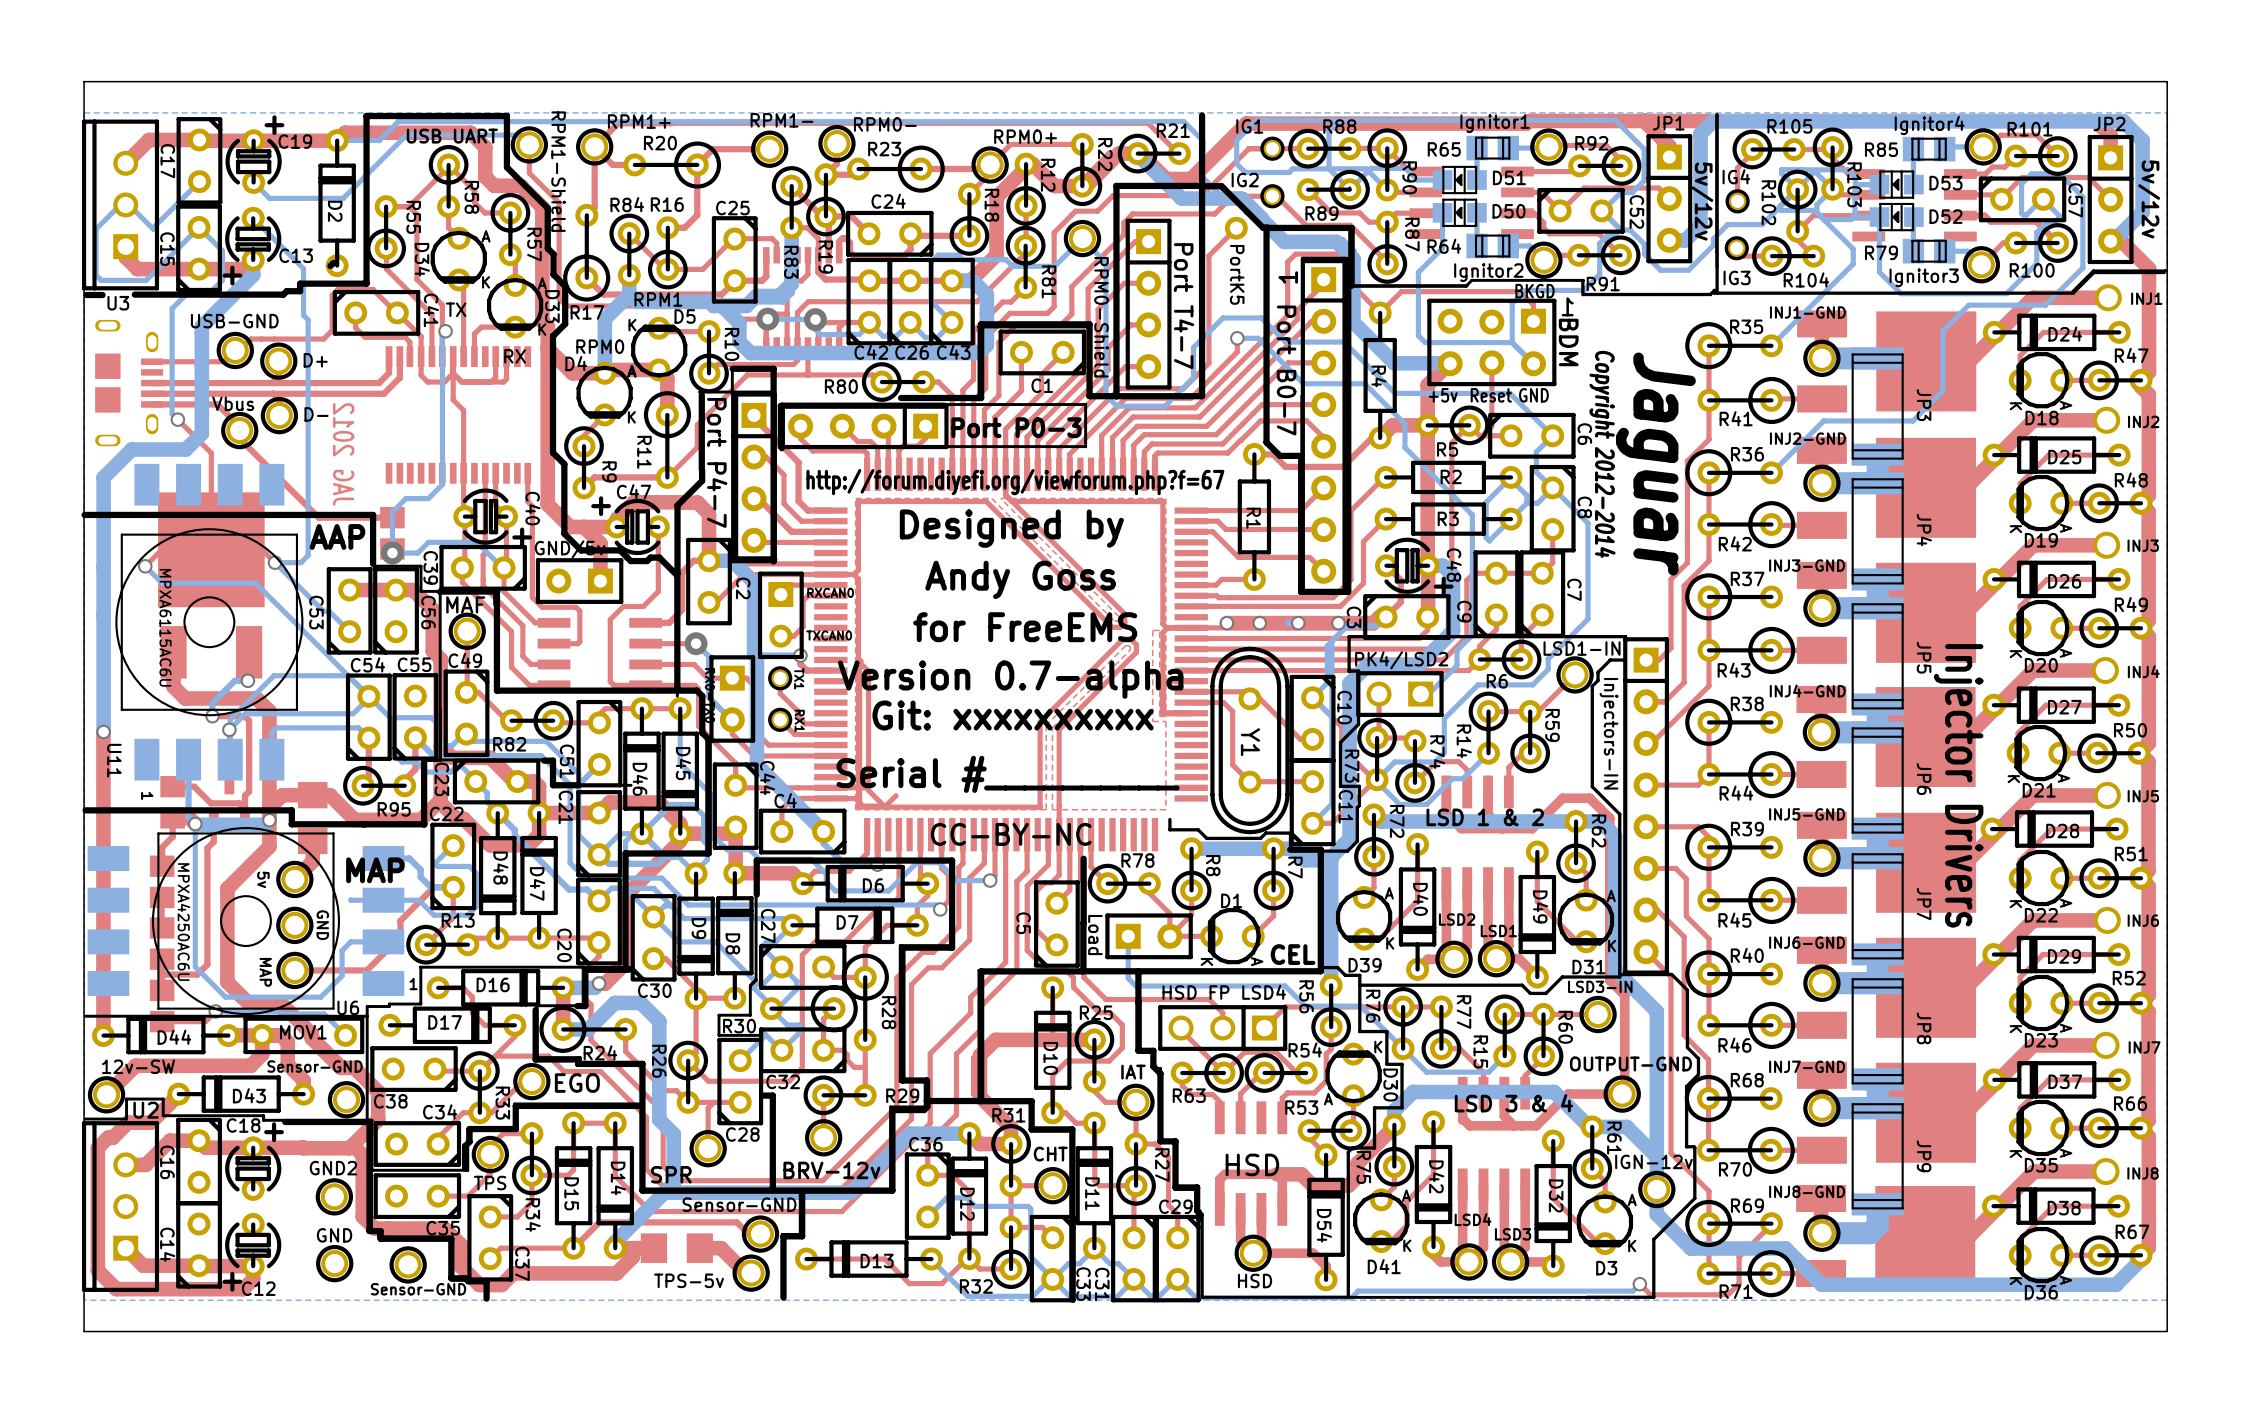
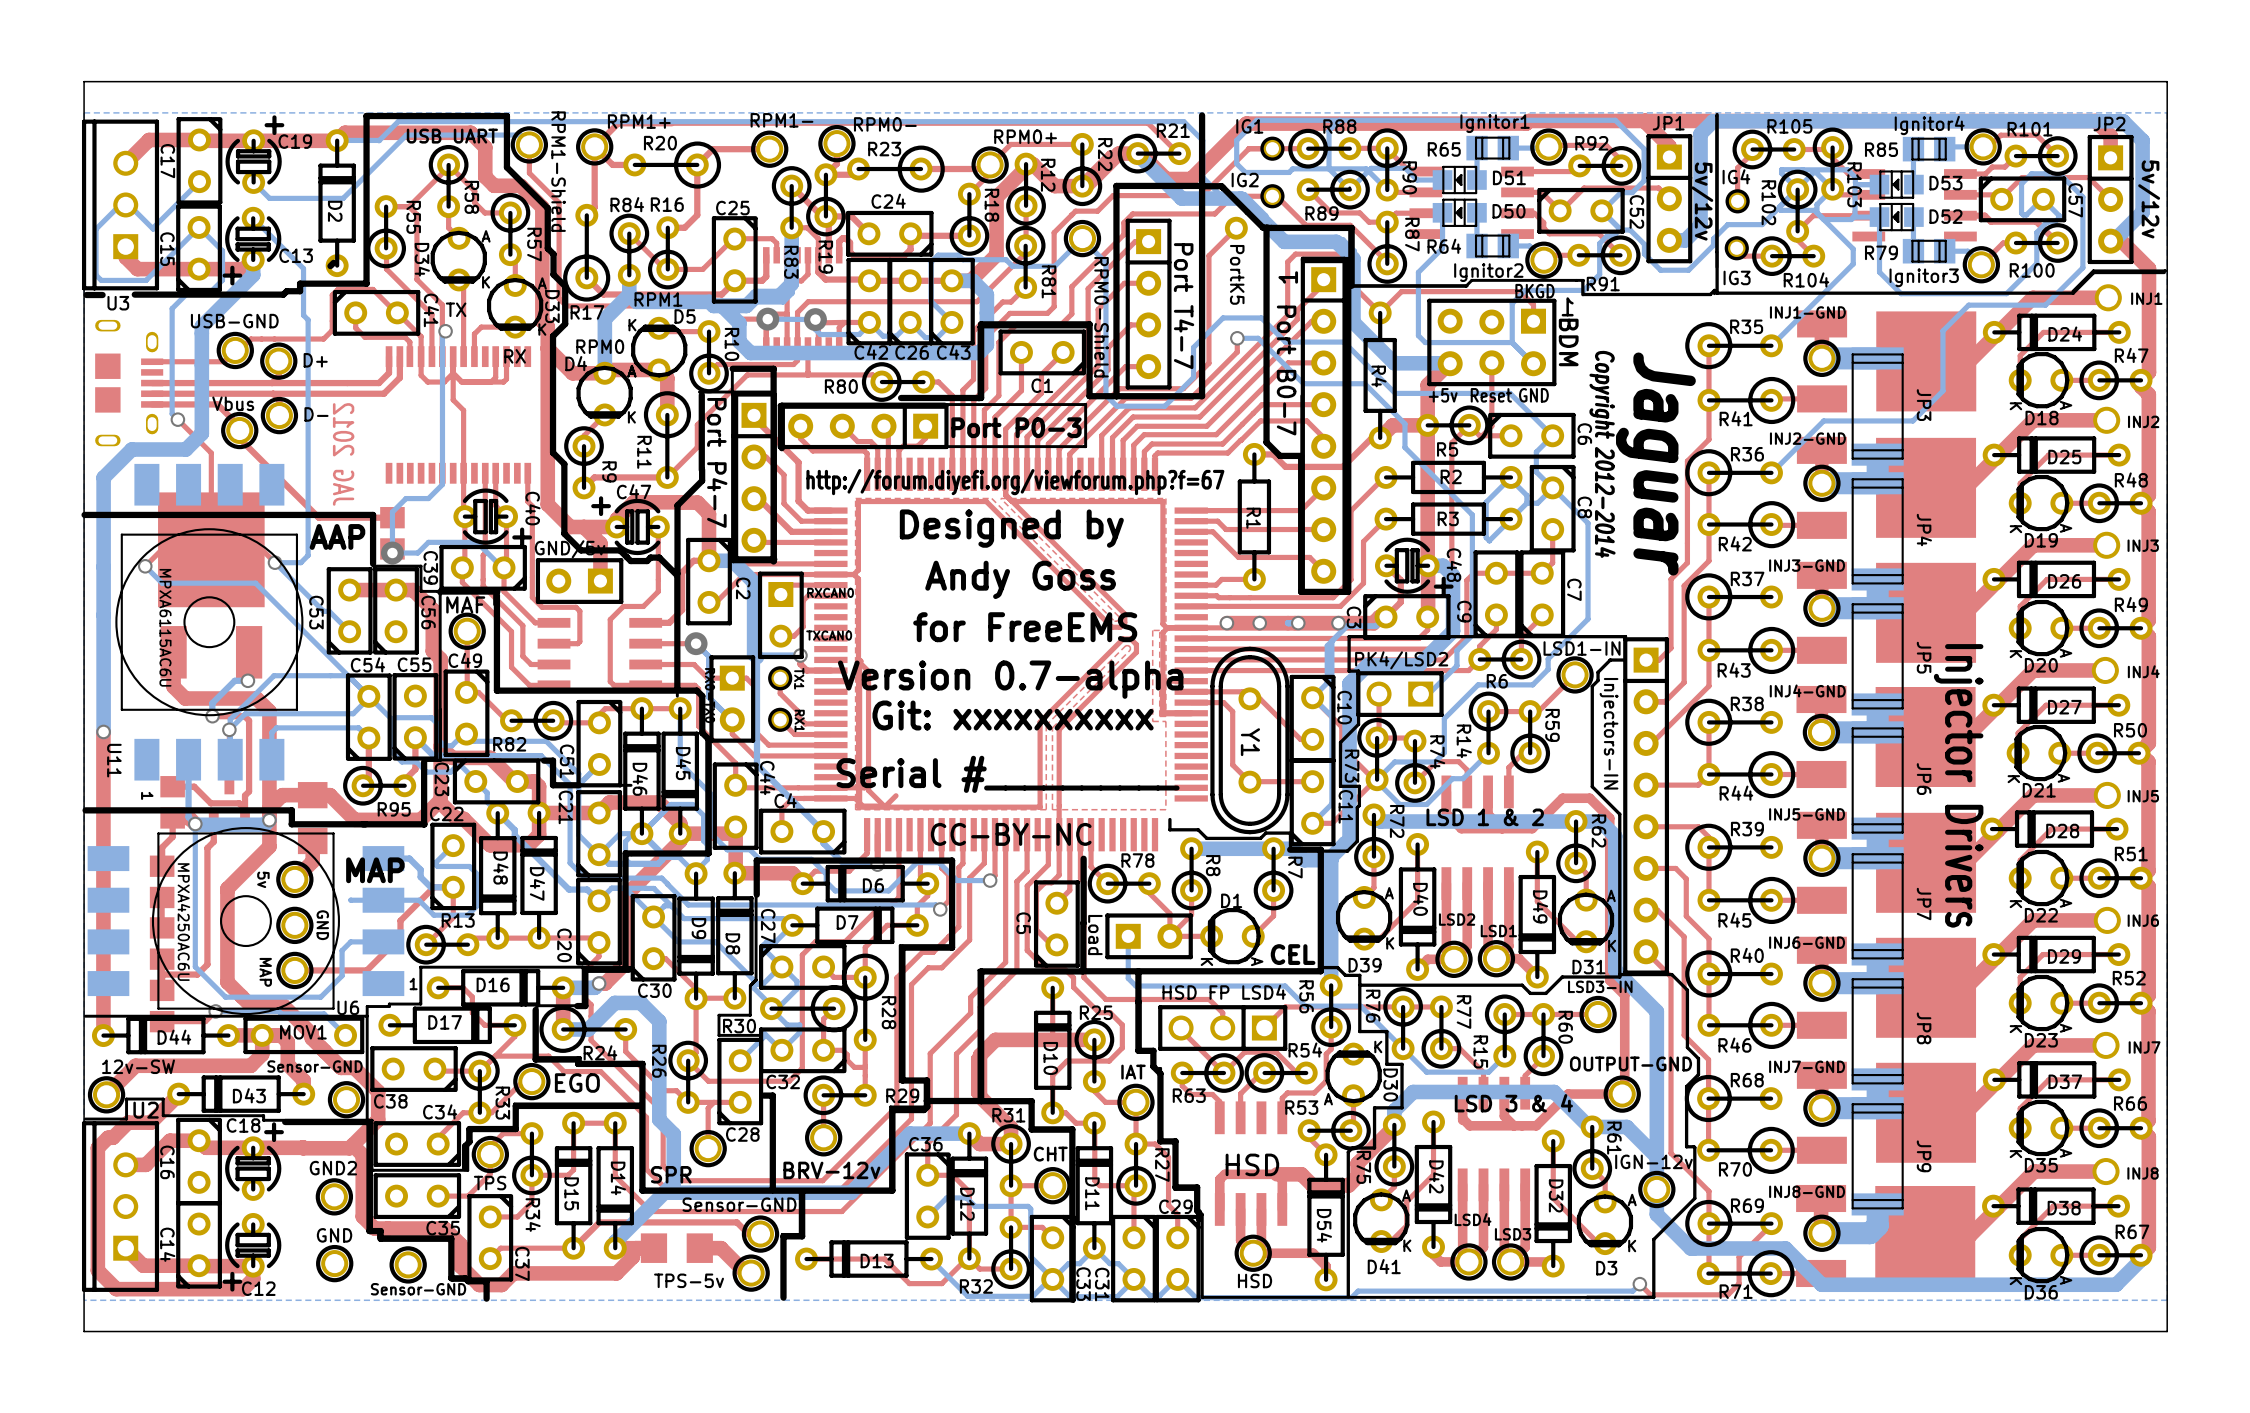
bottom track width: thick (756, 657) (756, 765) (823, 831) -> thin (756, 657) (756, 765) (823, 831)

